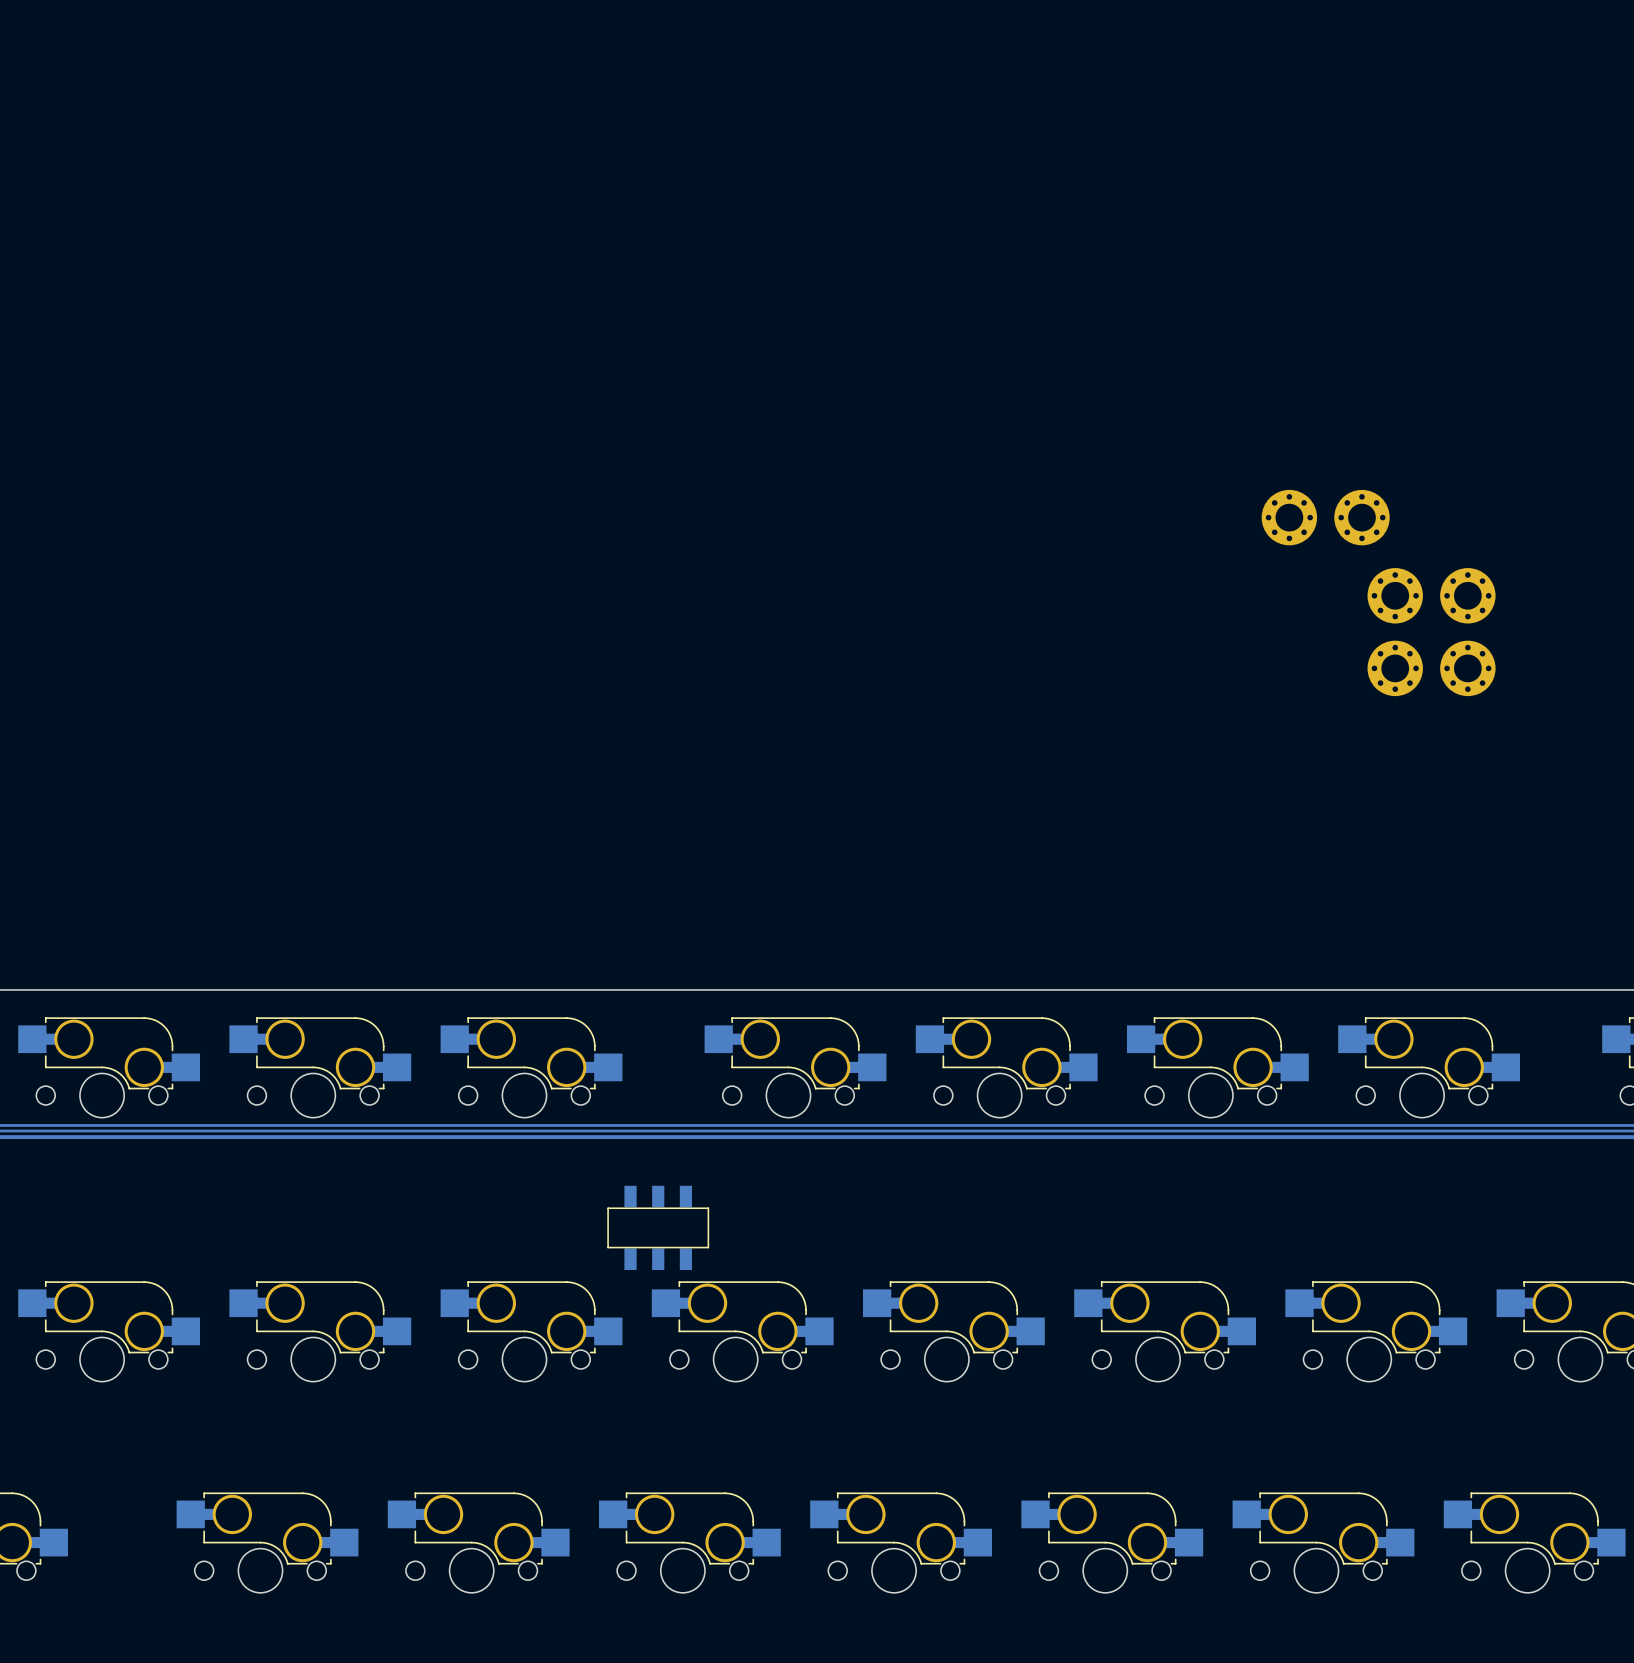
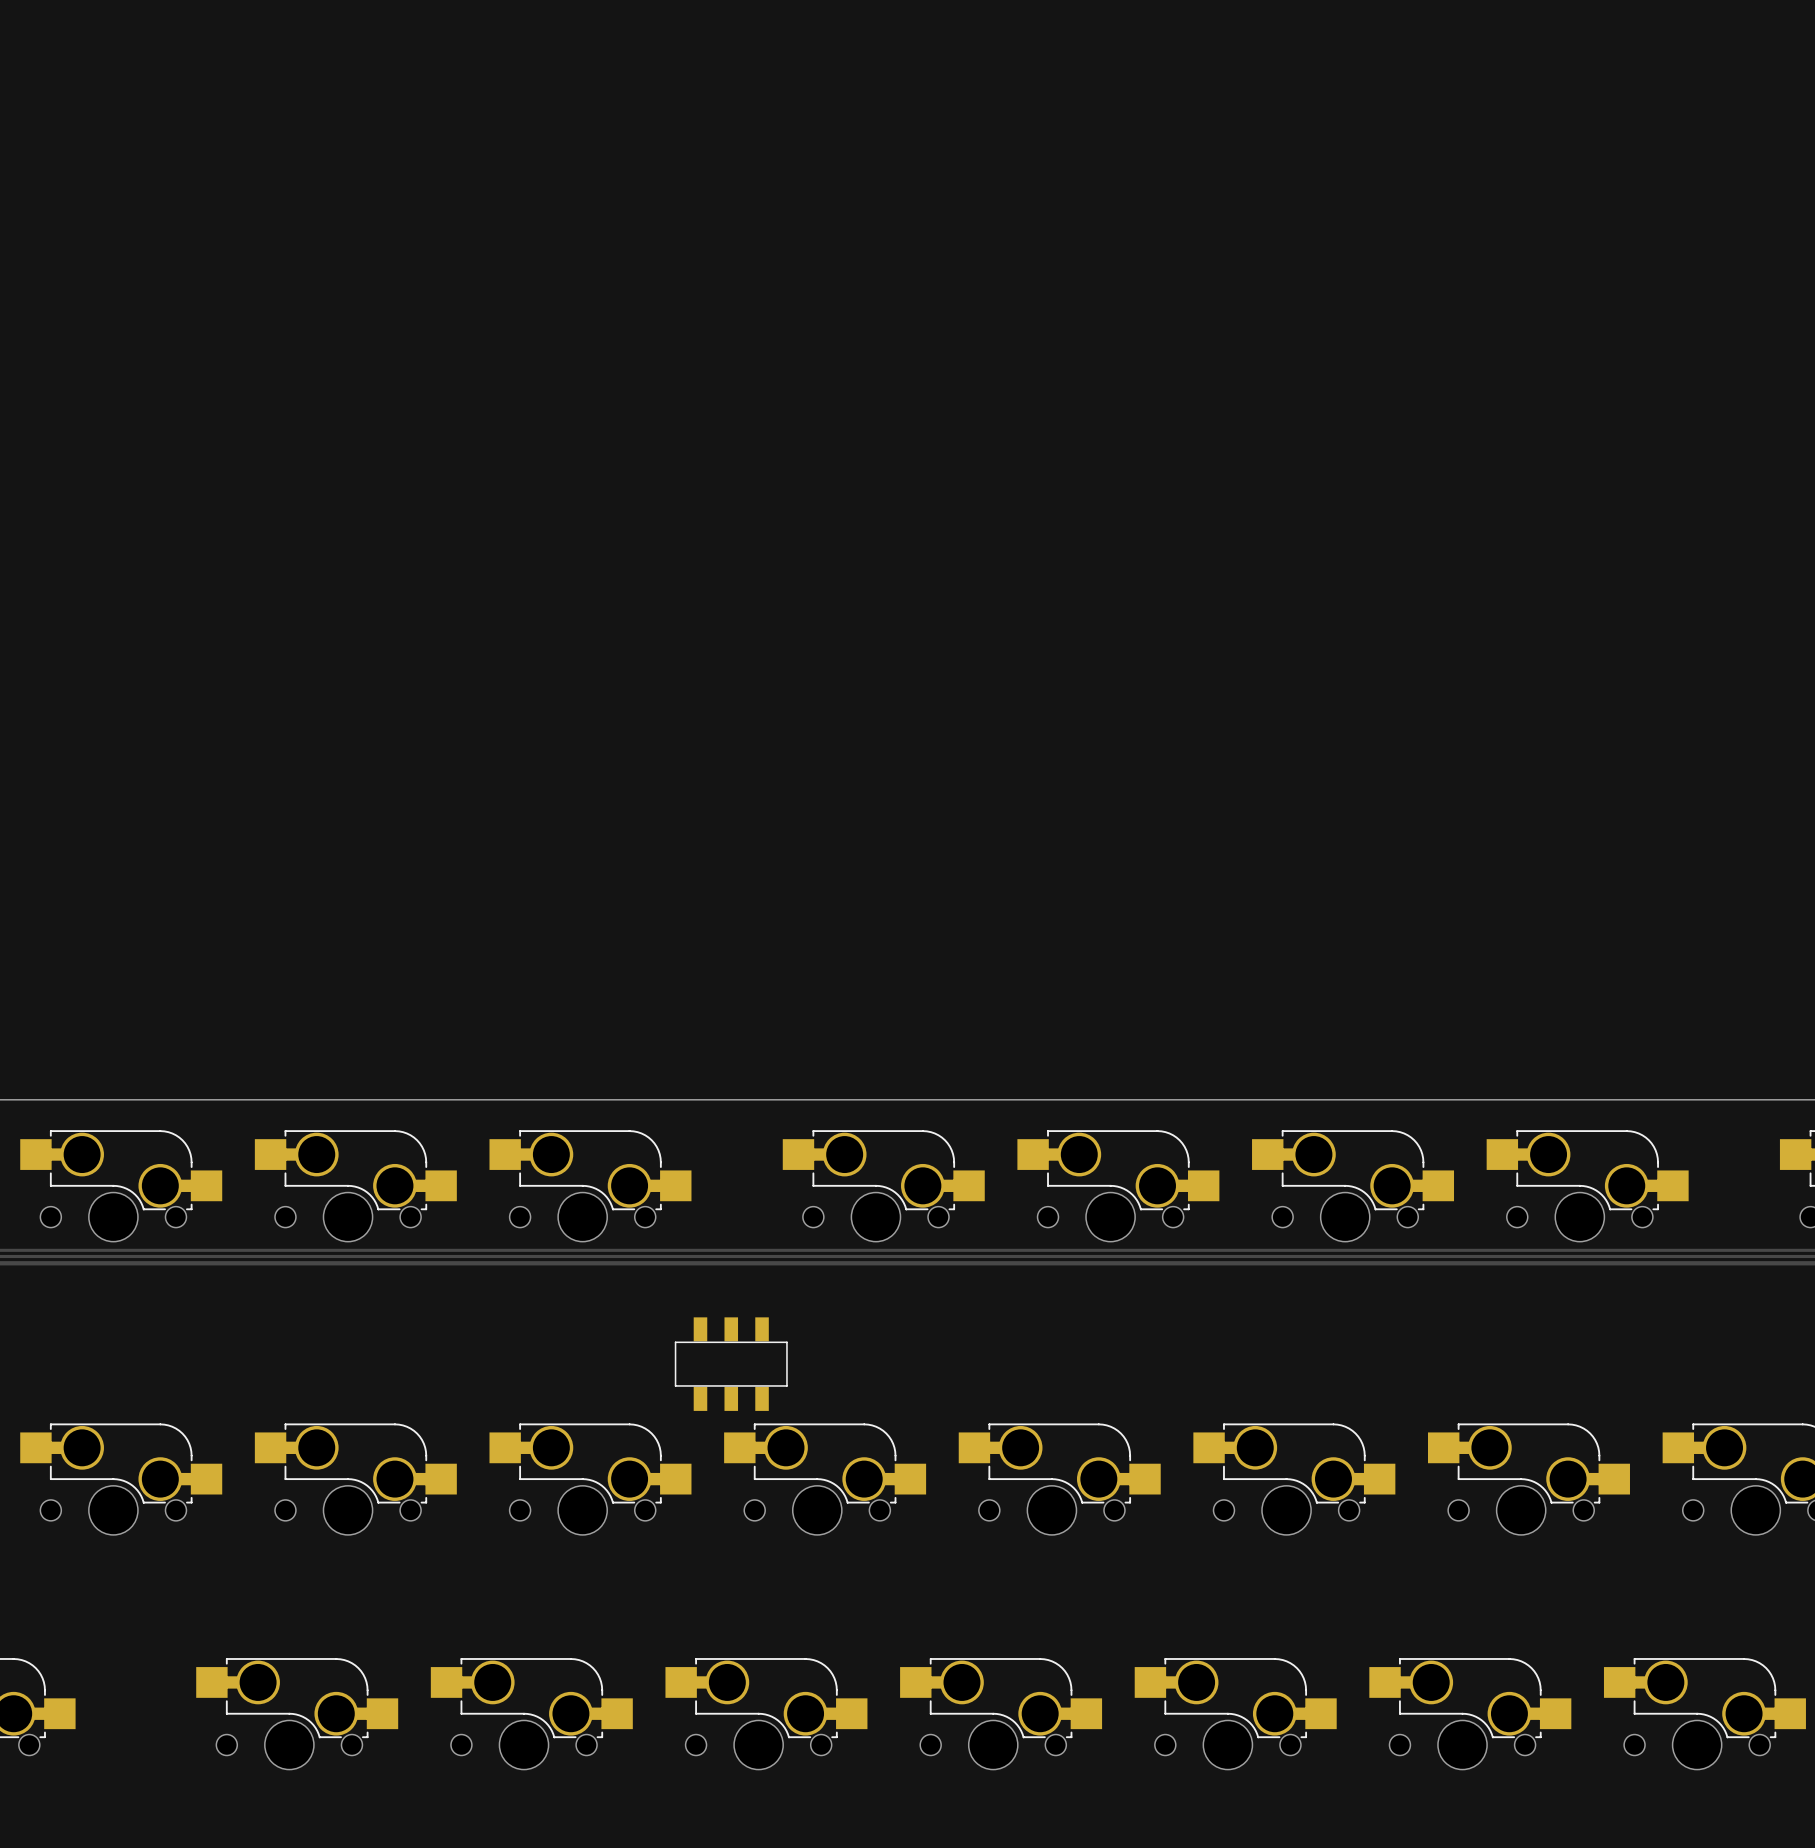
part: (1289, 517) -> none
part: (1361, 517) -> none
part: (1395, 595) -> none
part: (1467, 595) -> none
part: (1395, 668) -> none
part: (1467, 668) -> none

